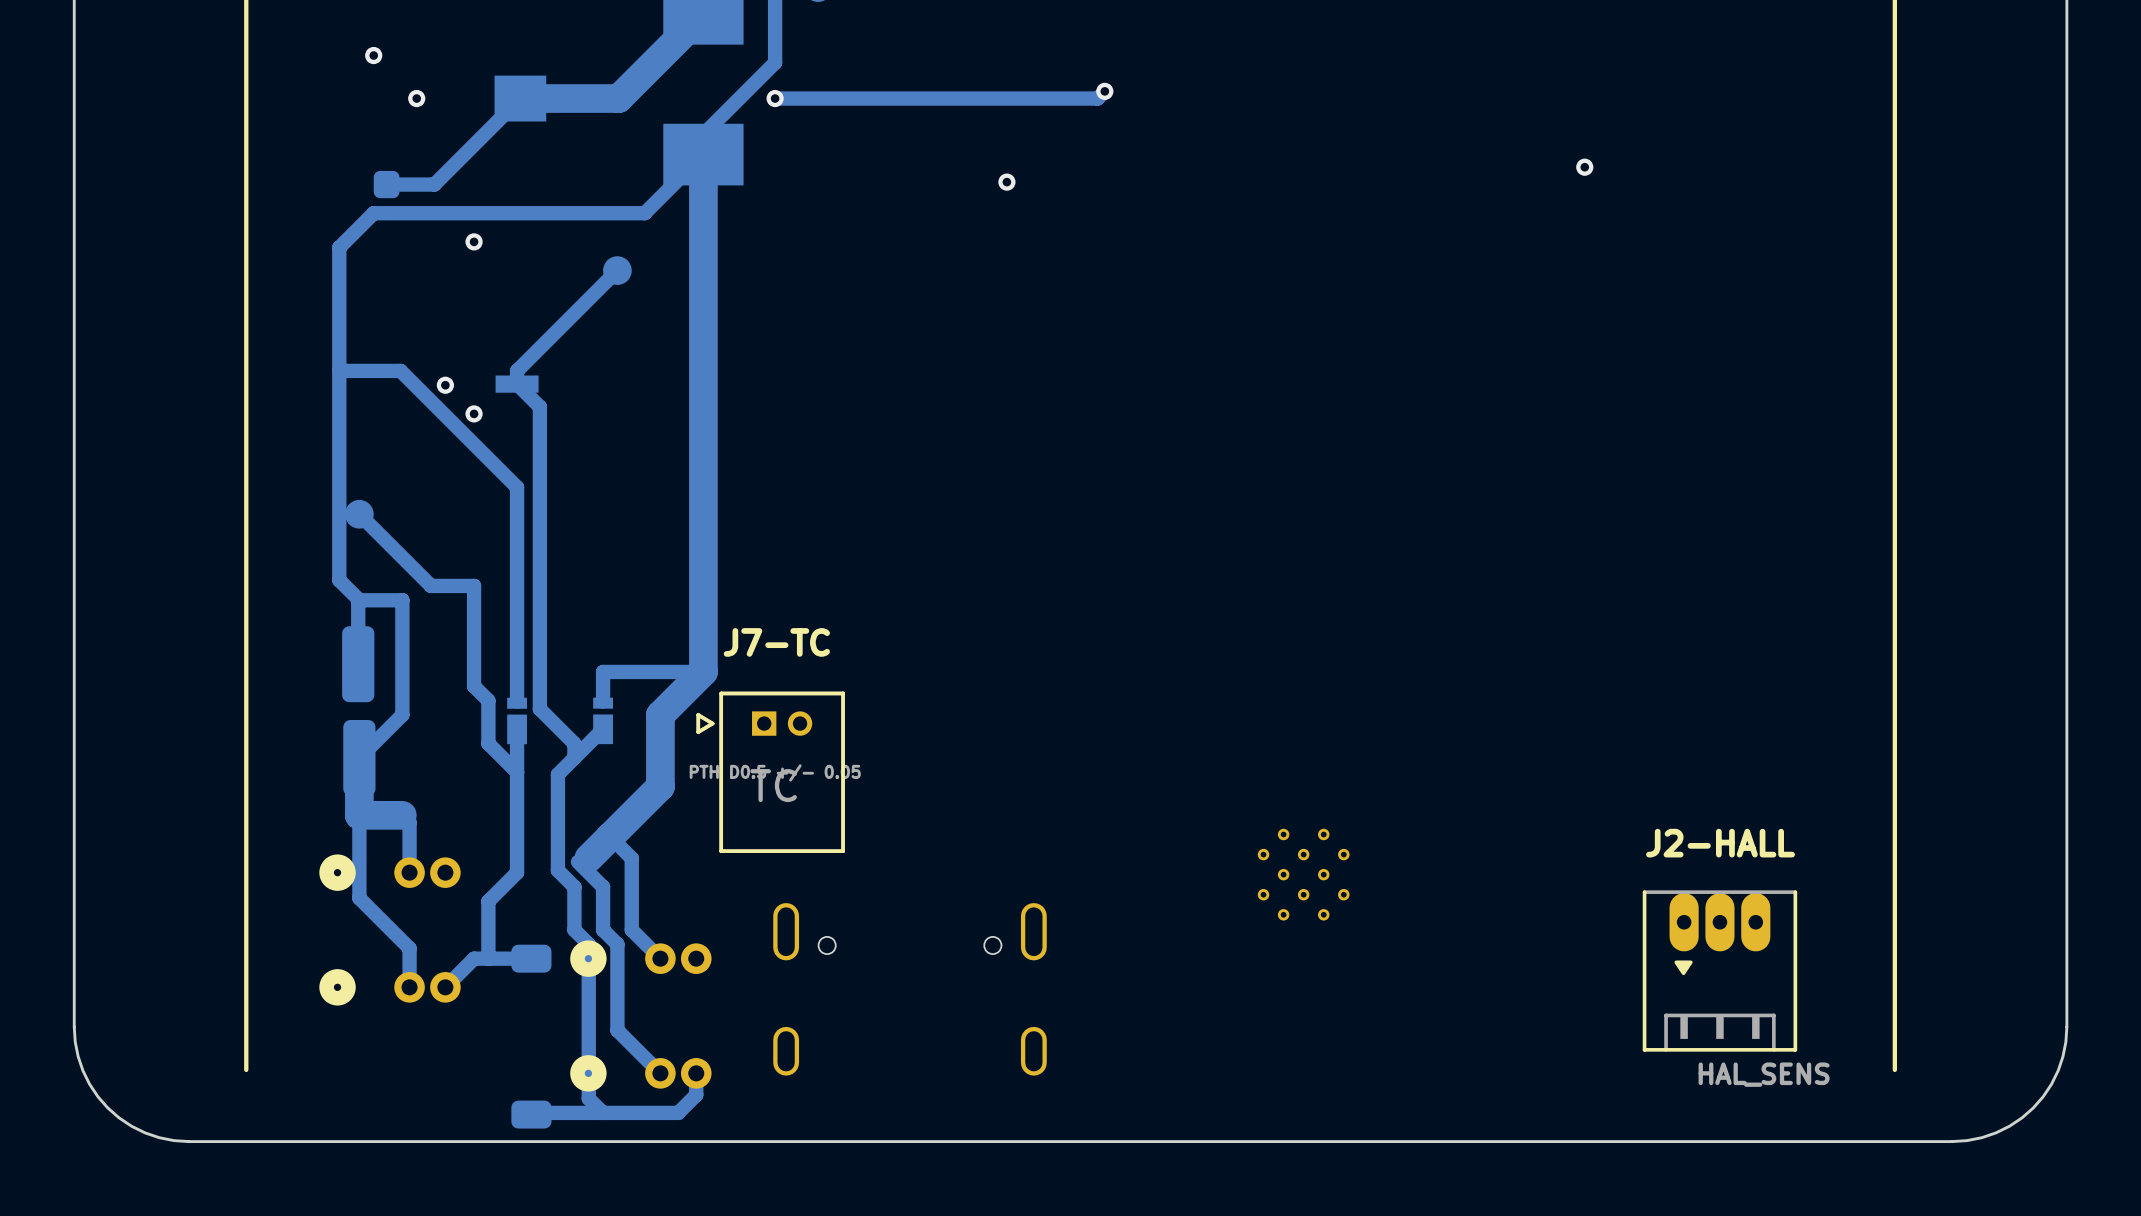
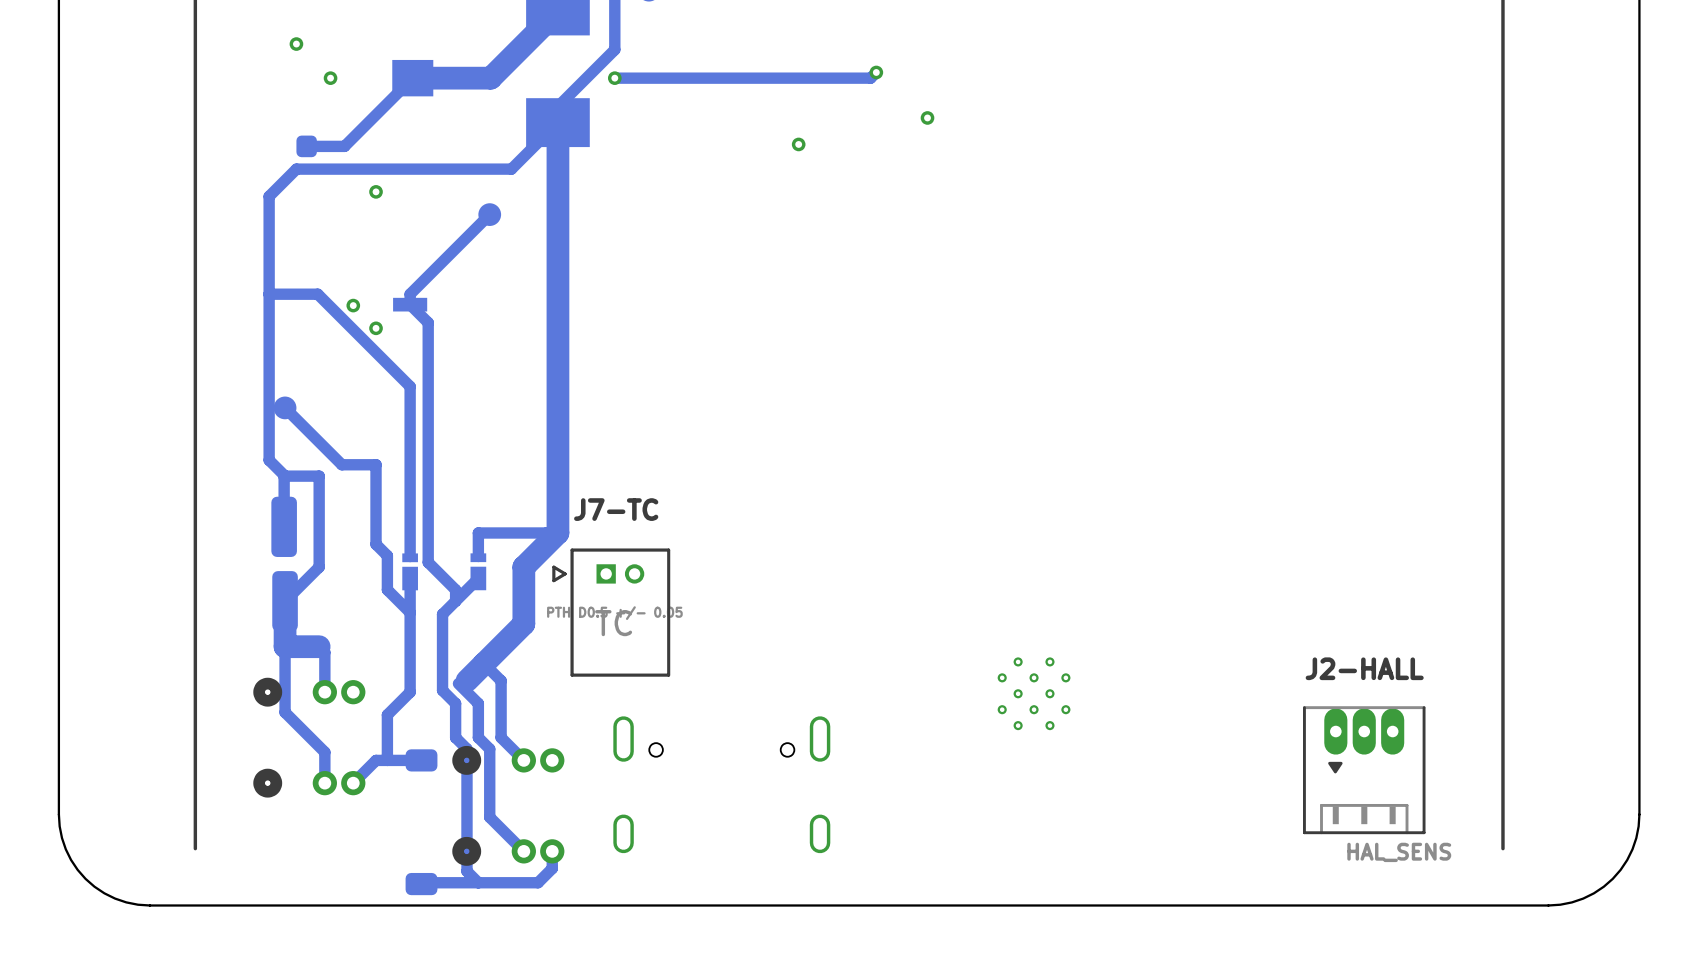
via: none -> (927, 117)
via: (1584, 167) -> none

